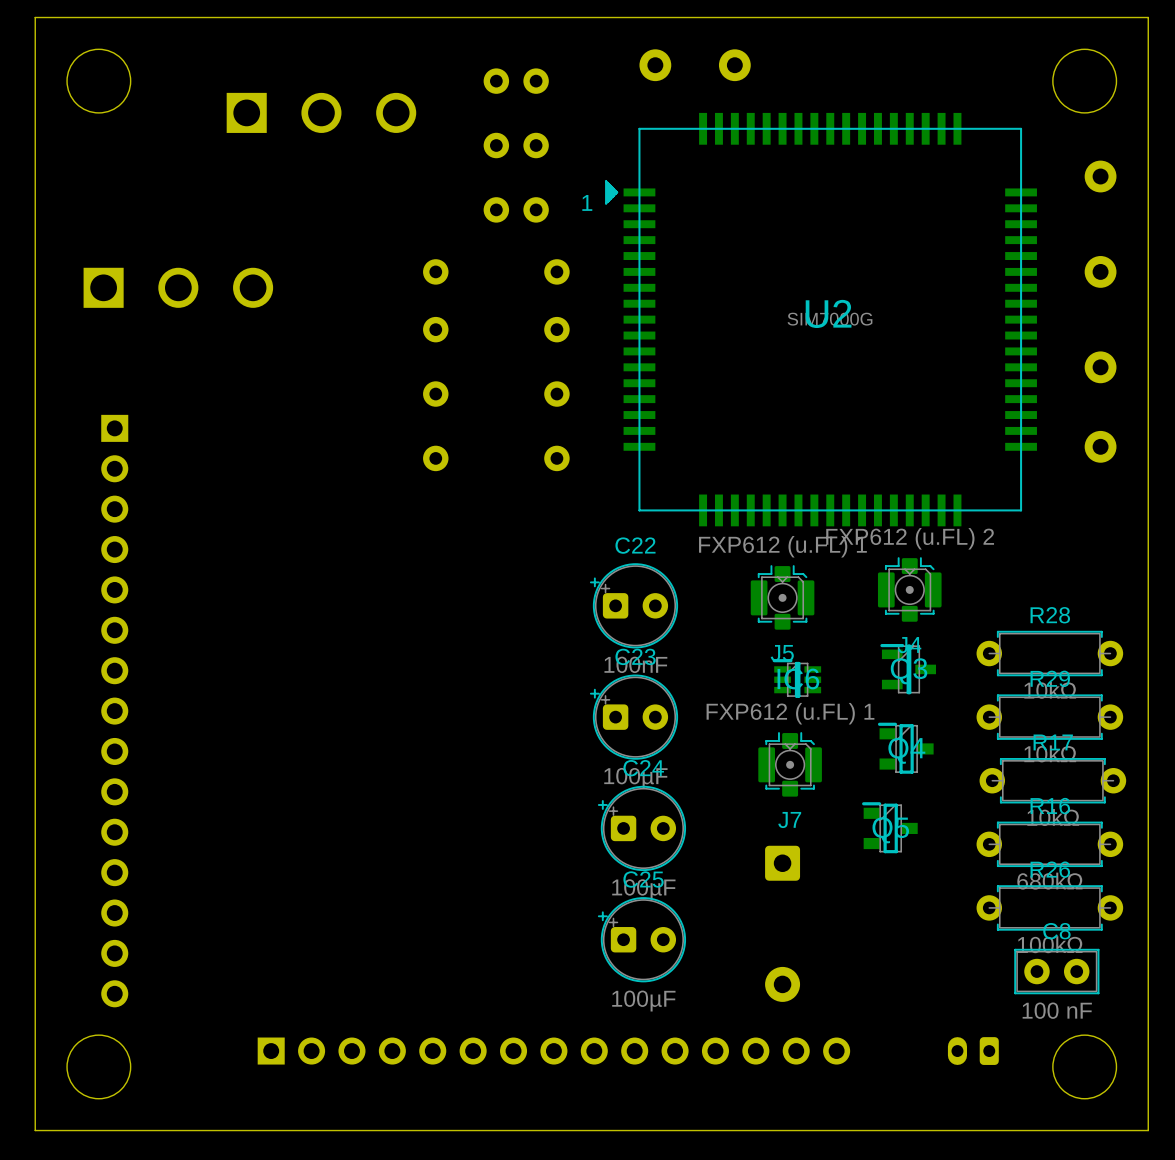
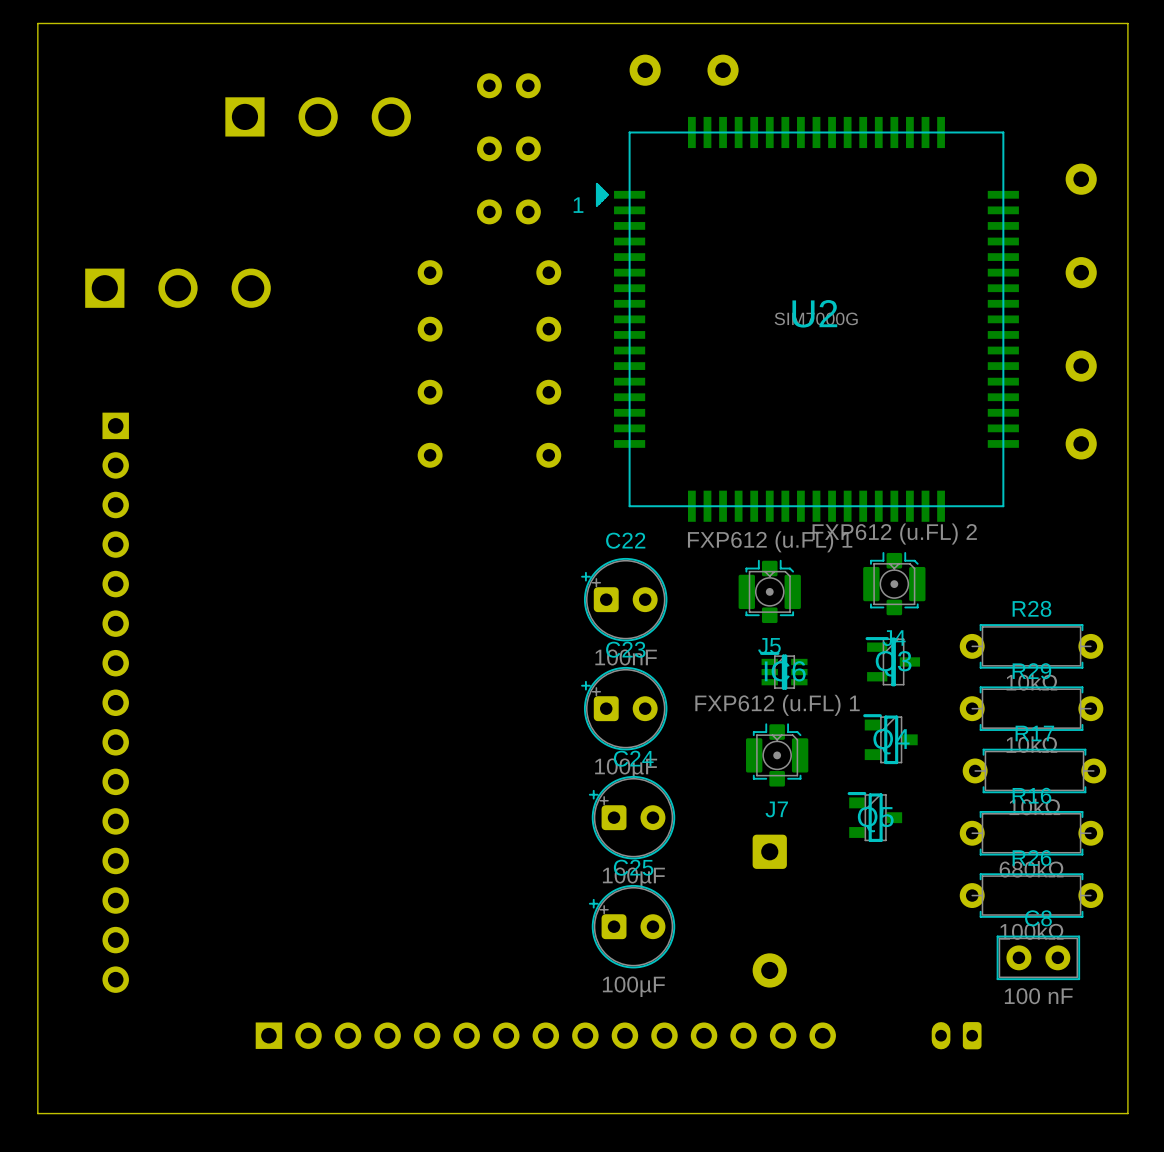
round board edge: [66, 48, 132, 114] -> none
round board edge: [1052, 48, 1117, 114] -> none
round board edge: [66, 1034, 132, 1100] -> none
round board edge: [1052, 1034, 1117, 1100] -> none

